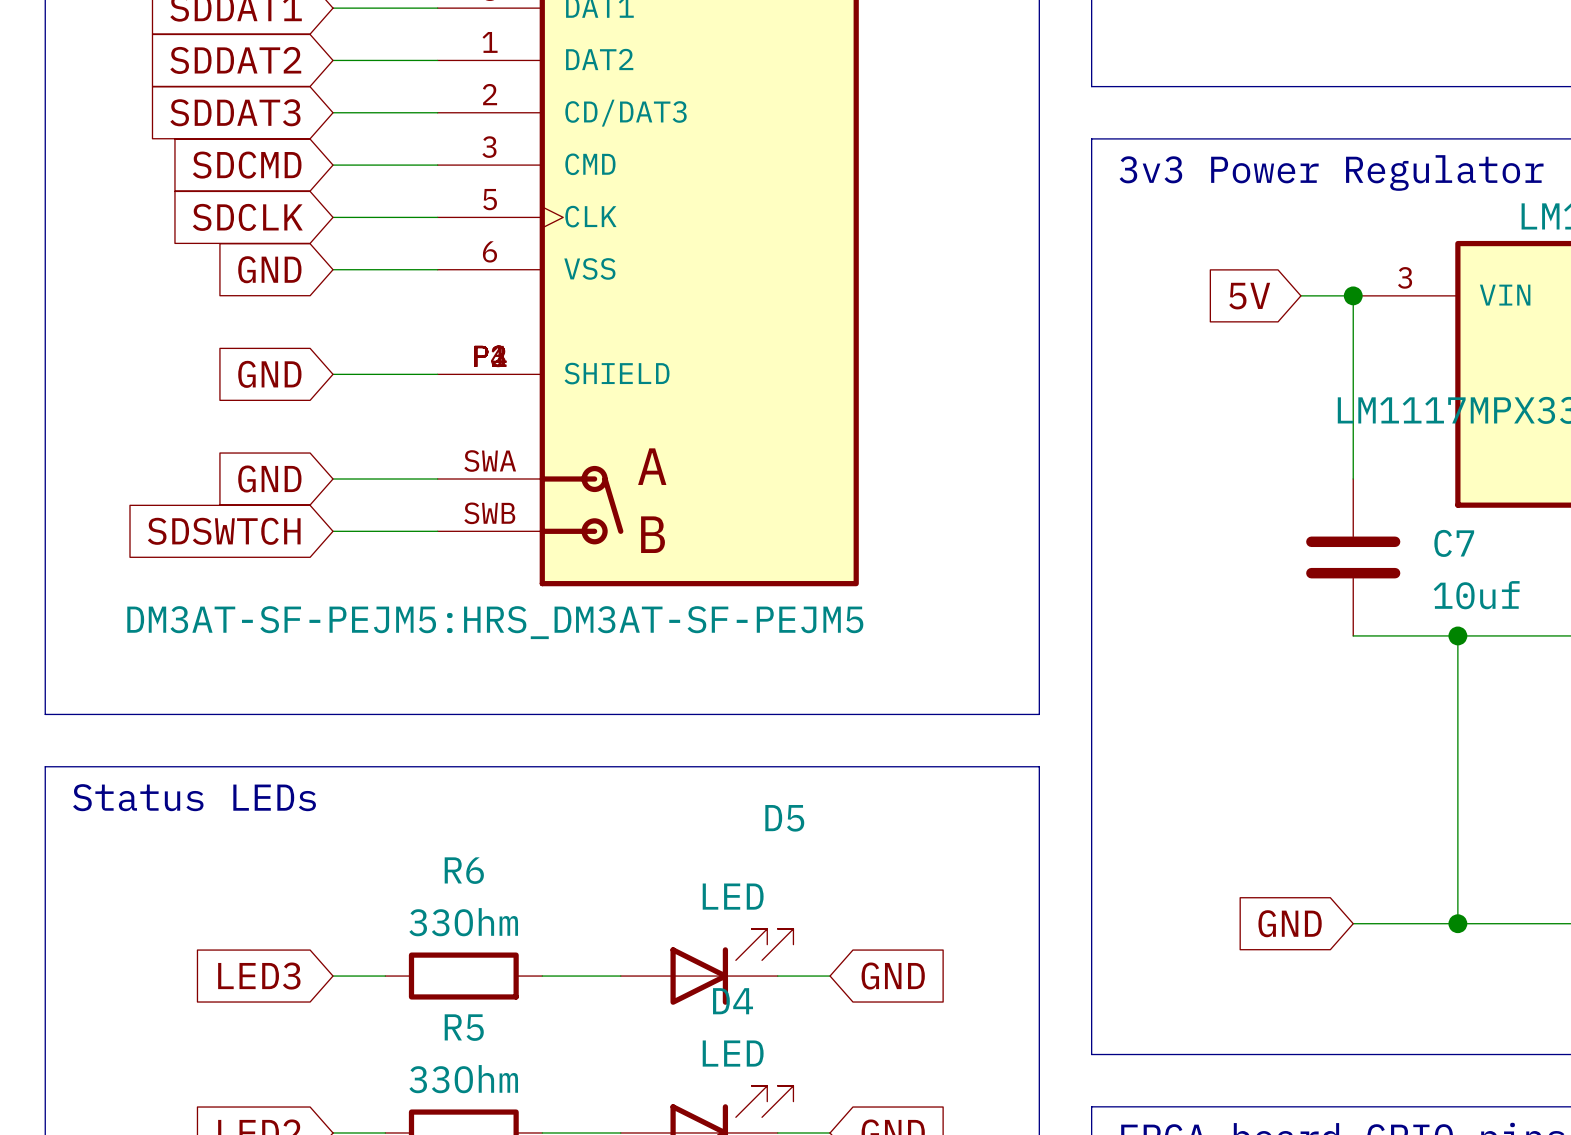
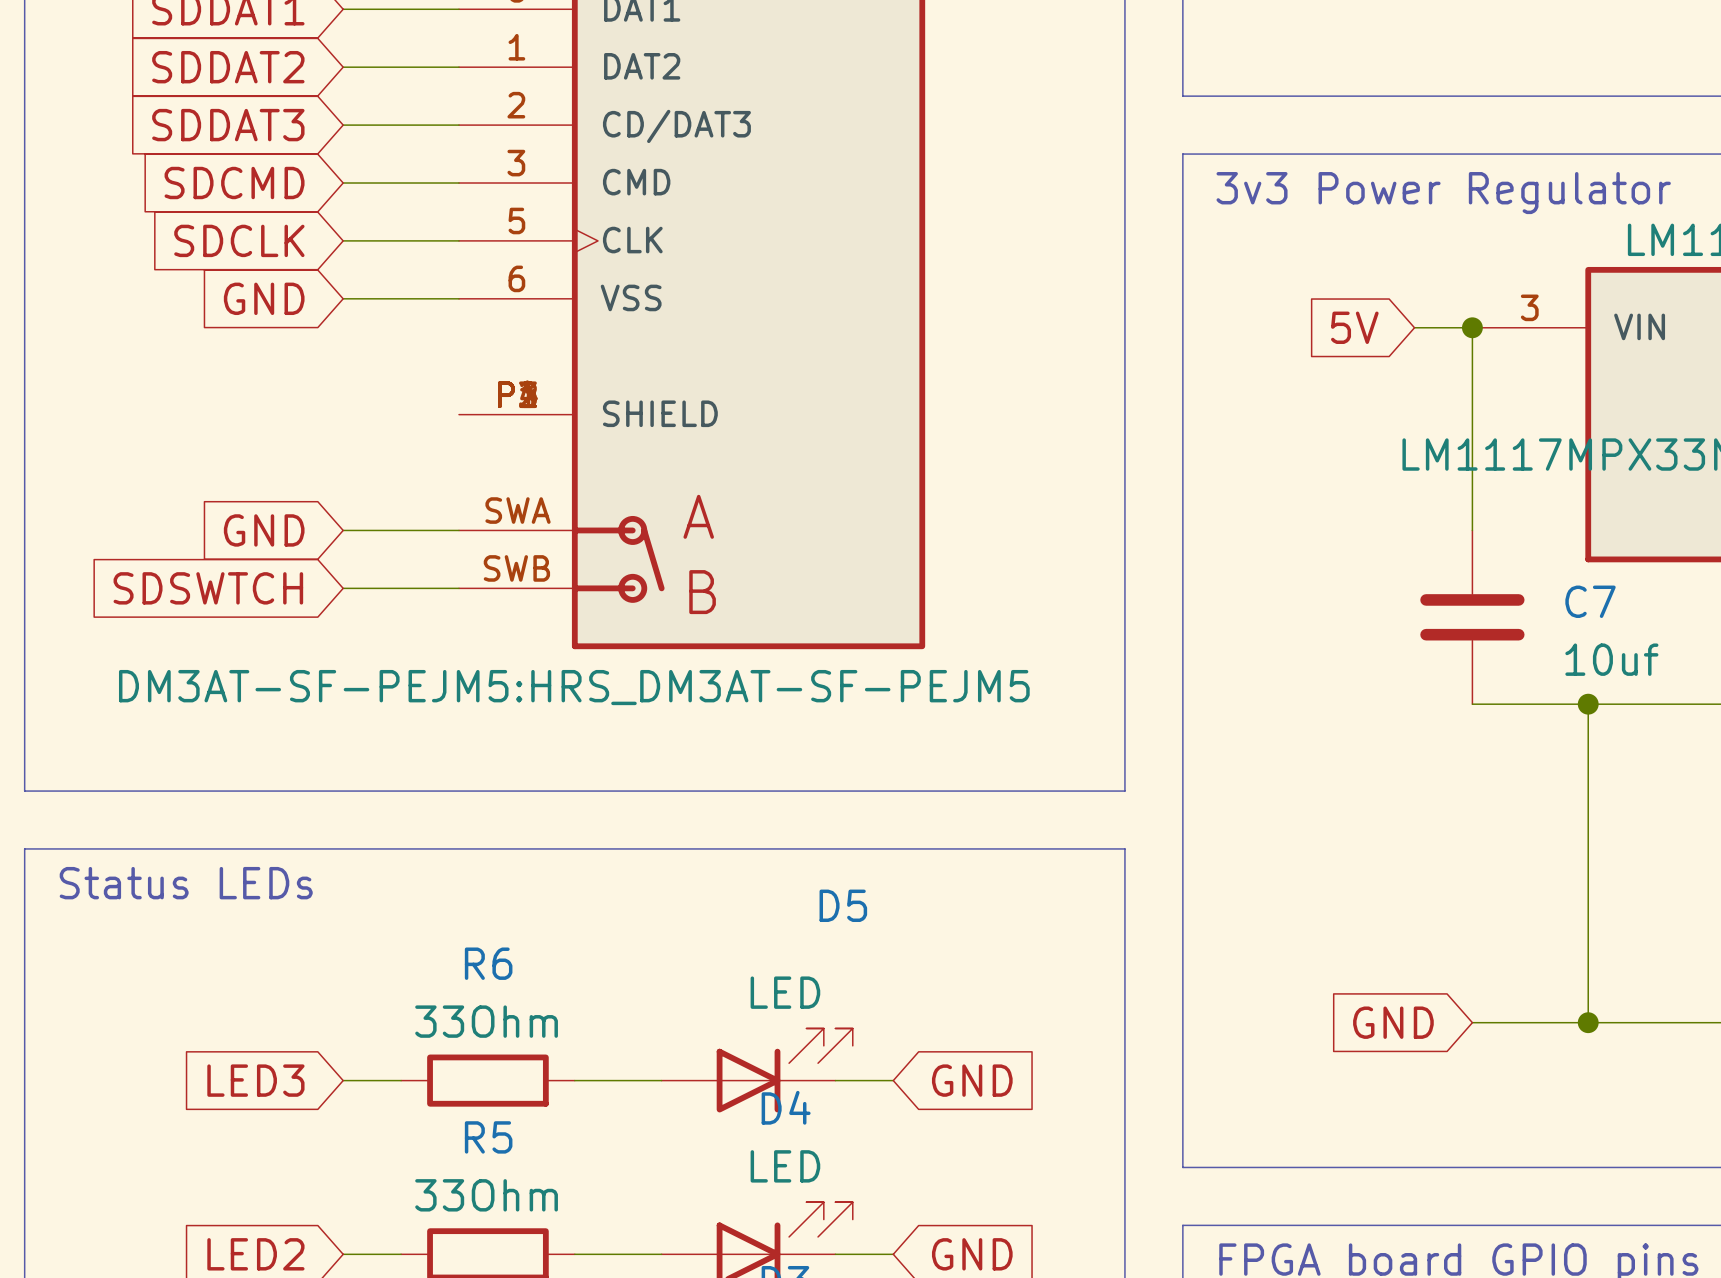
global label: GND (269, 374) -> none
wire: (333, 374) (437, 374) -> none

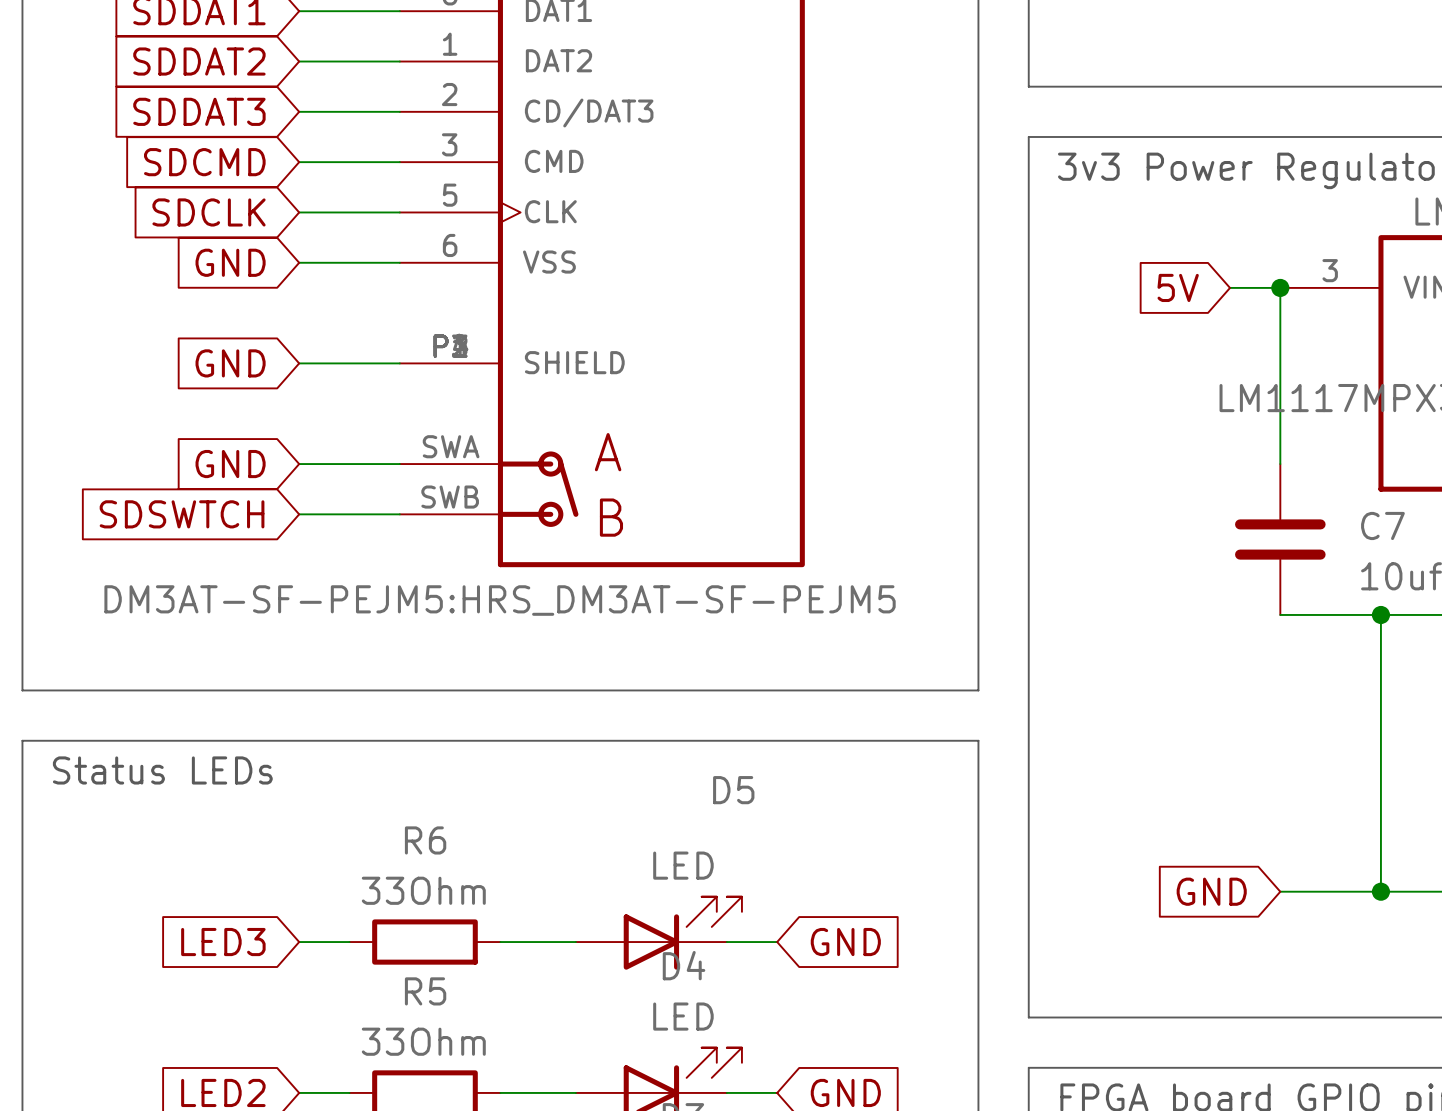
global label: none -> GND (230, 363)
wire: none -> (299, 363) (399, 363)

